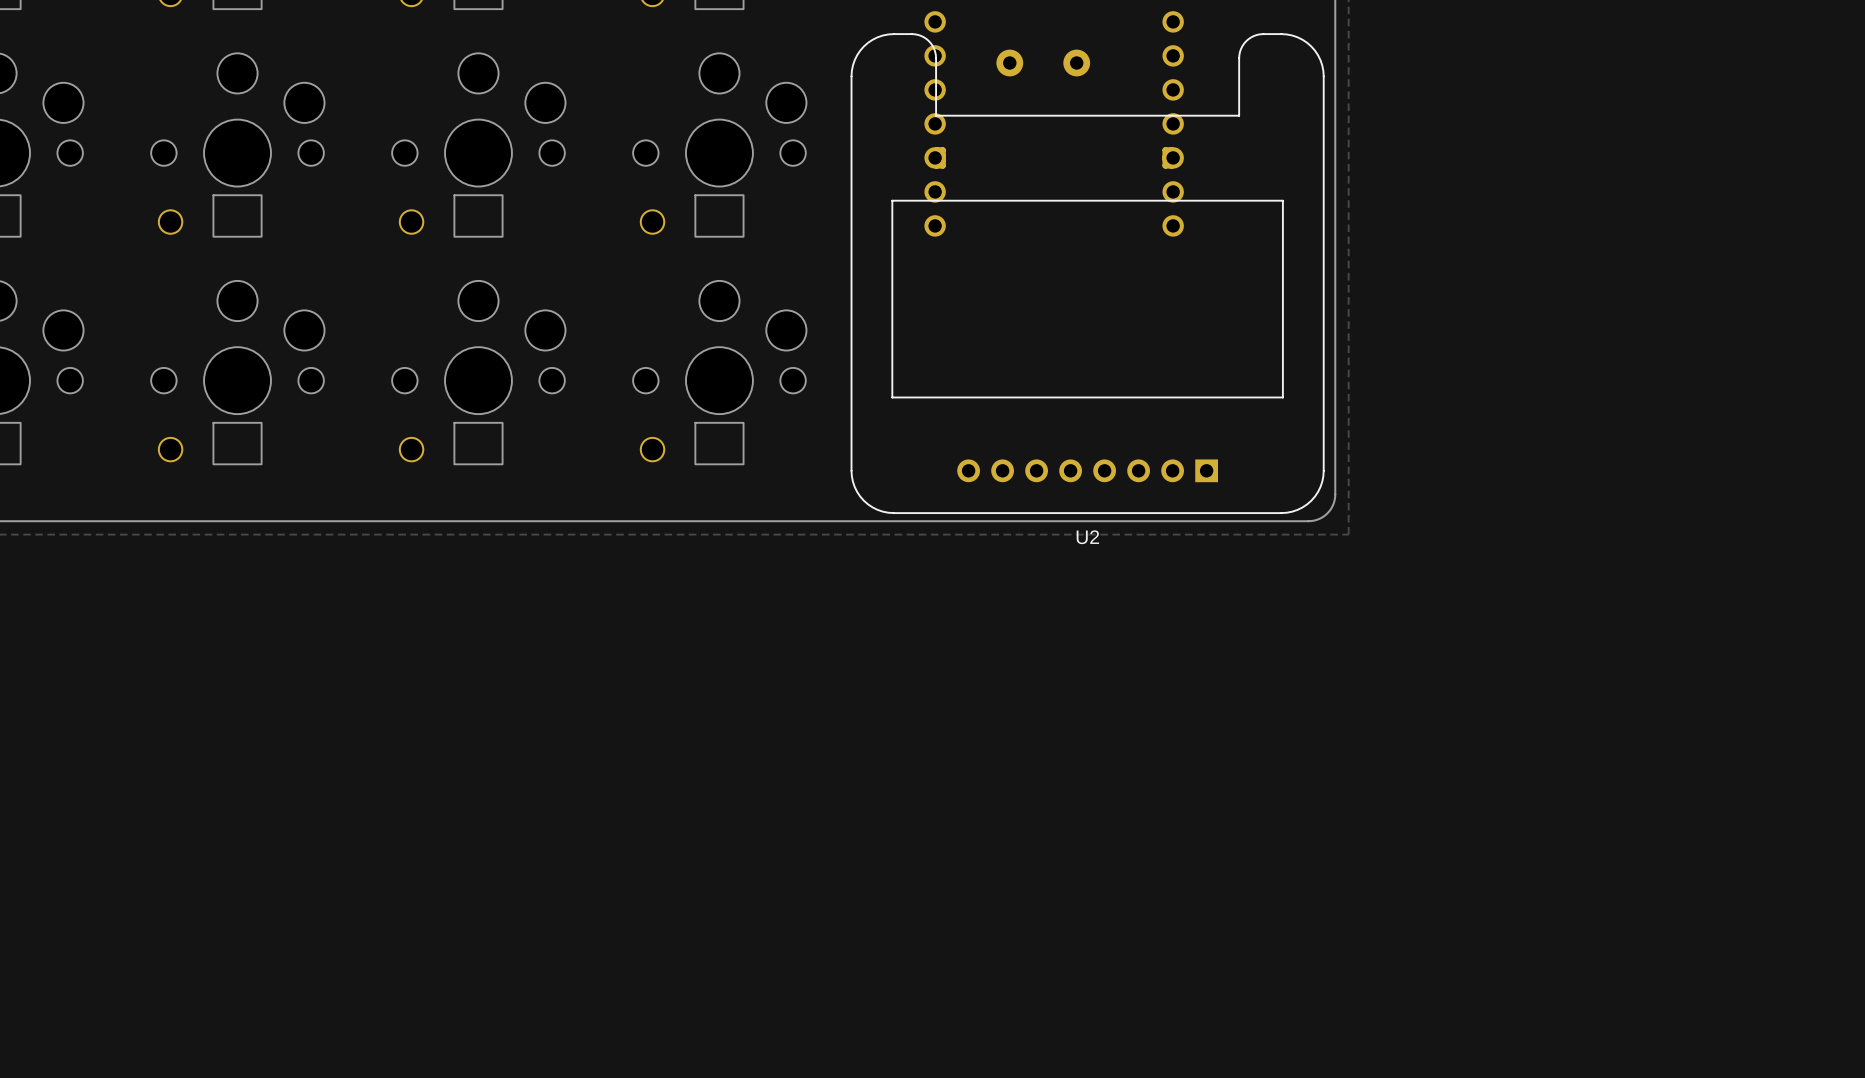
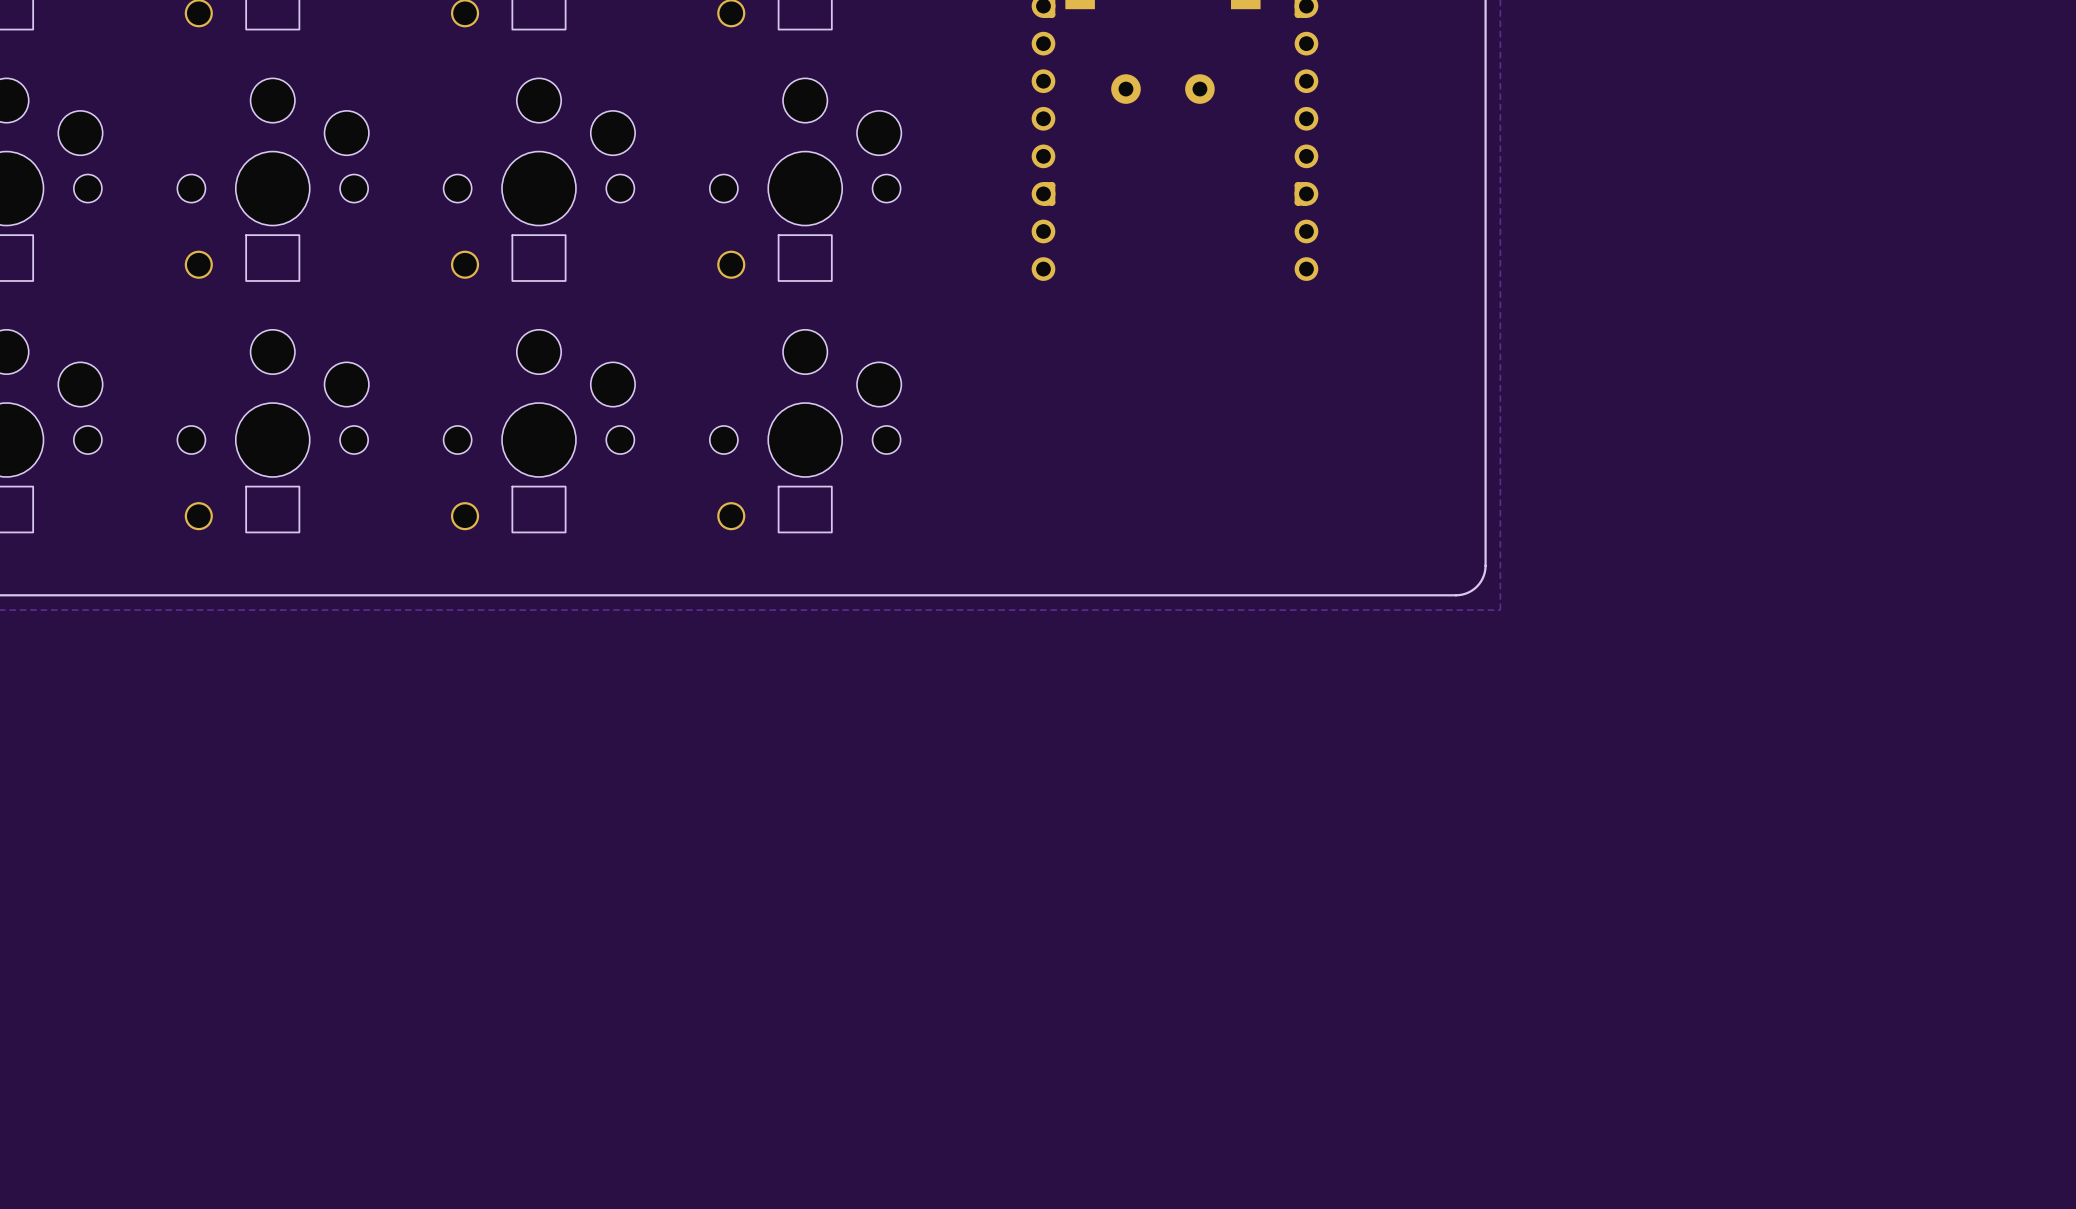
U2: (1087, 273) -> none

